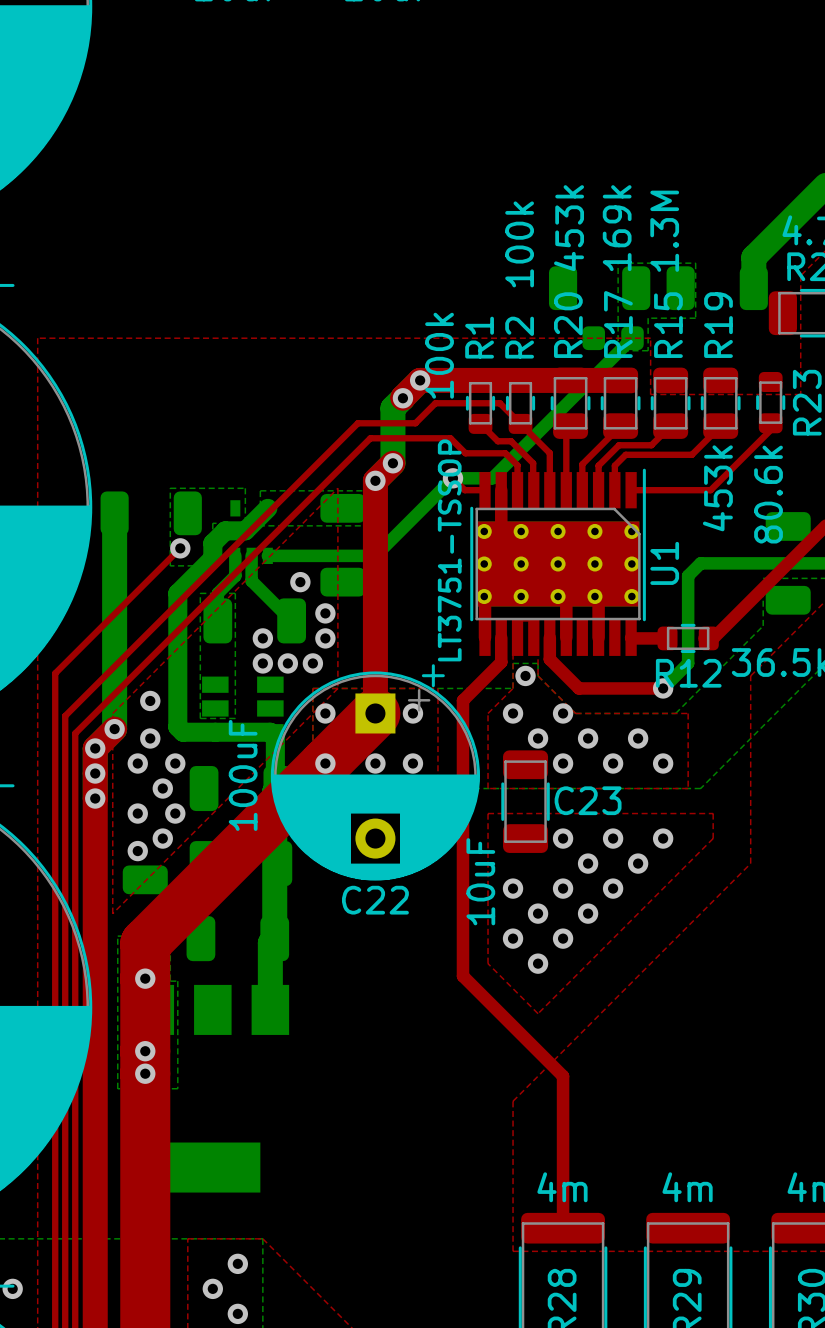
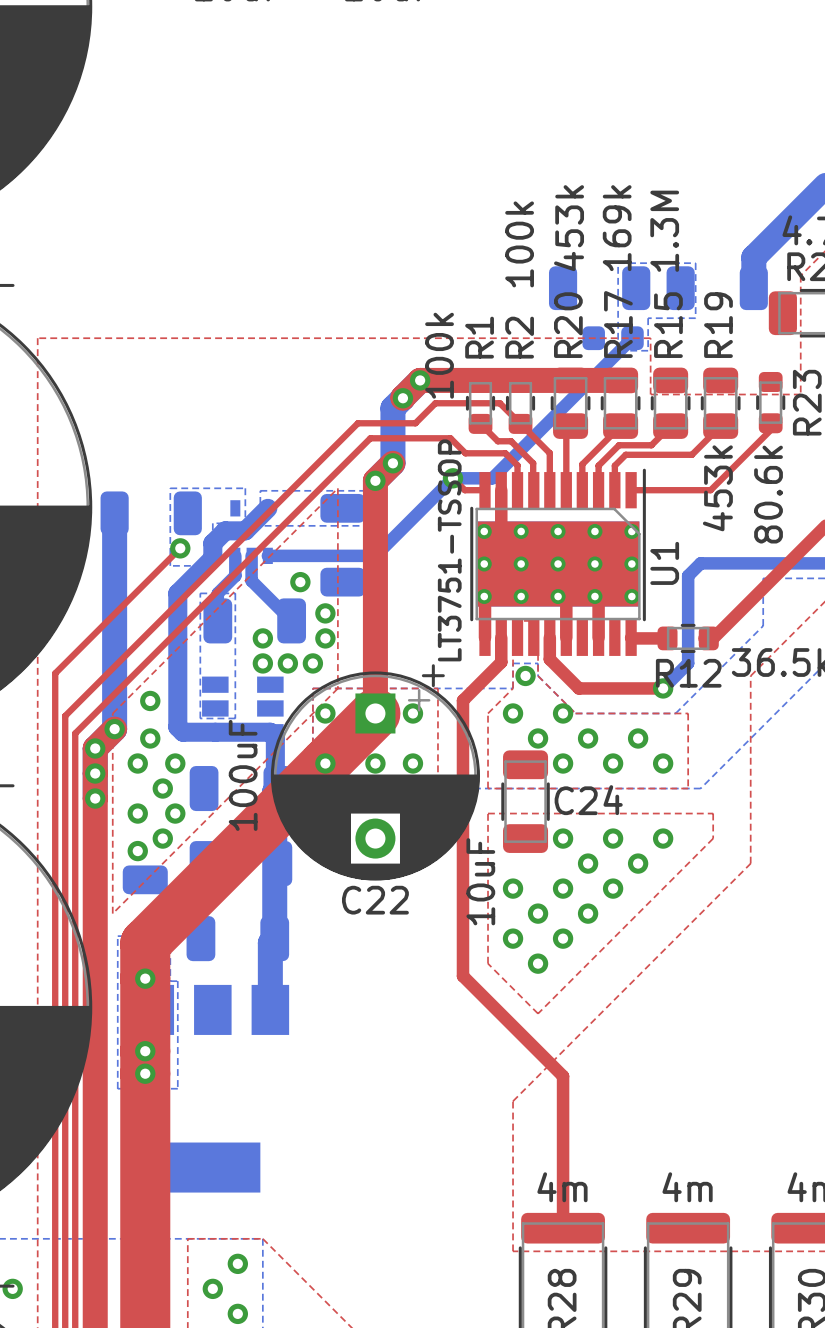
part: (788, 563) -> none
C23 name: C23 (588, 800) -> C24 (588, 800)

